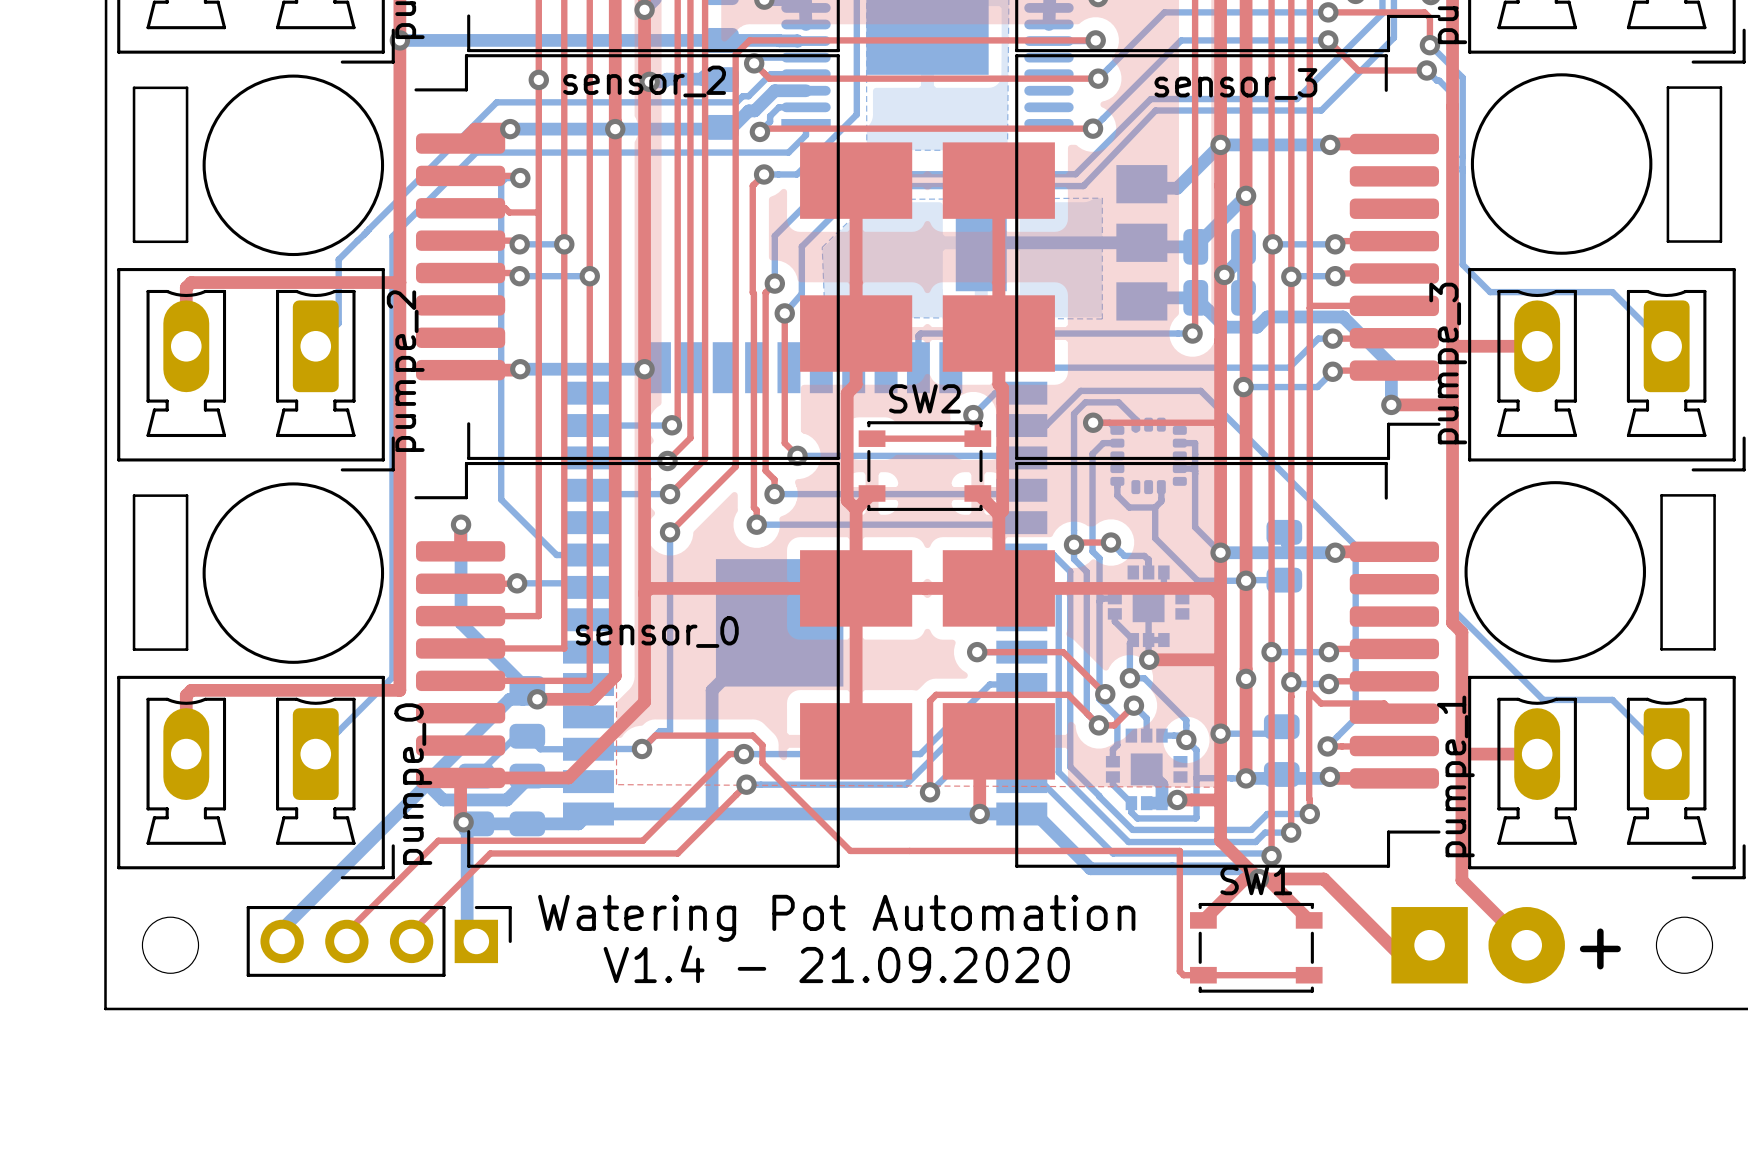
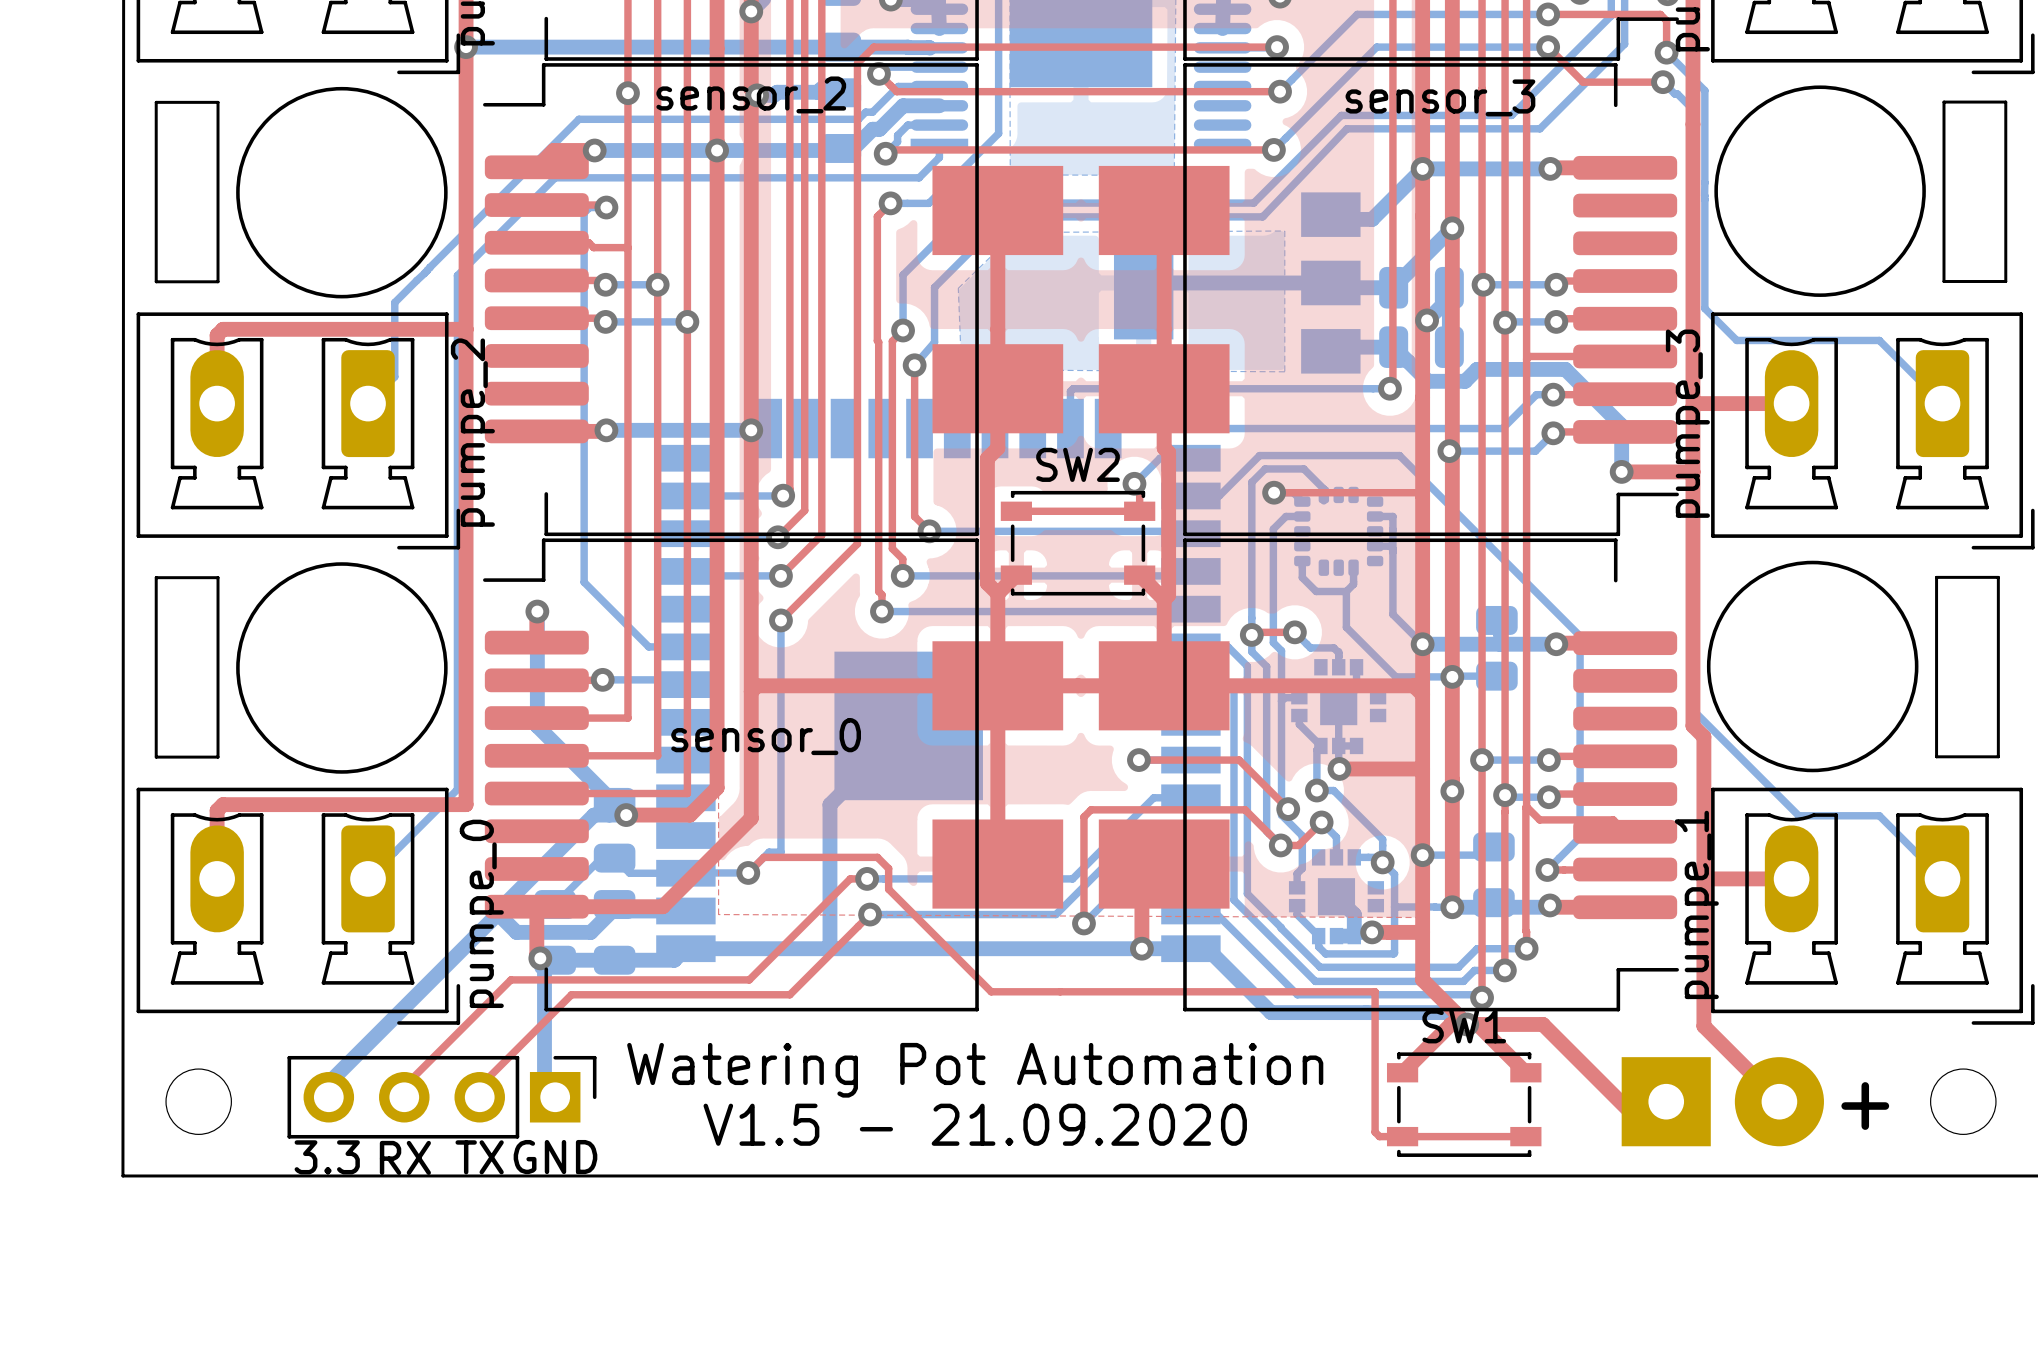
text: V1.4 - 21.09.2020 (836, 964) -> V1.5 - 21.09.2020 (975, 1124)
text: none -> 3.3 (327, 1157)
text: none -> TX (479, 1157)
text: none -> GND (555, 1157)
text: none -> RX (405, 1157)

